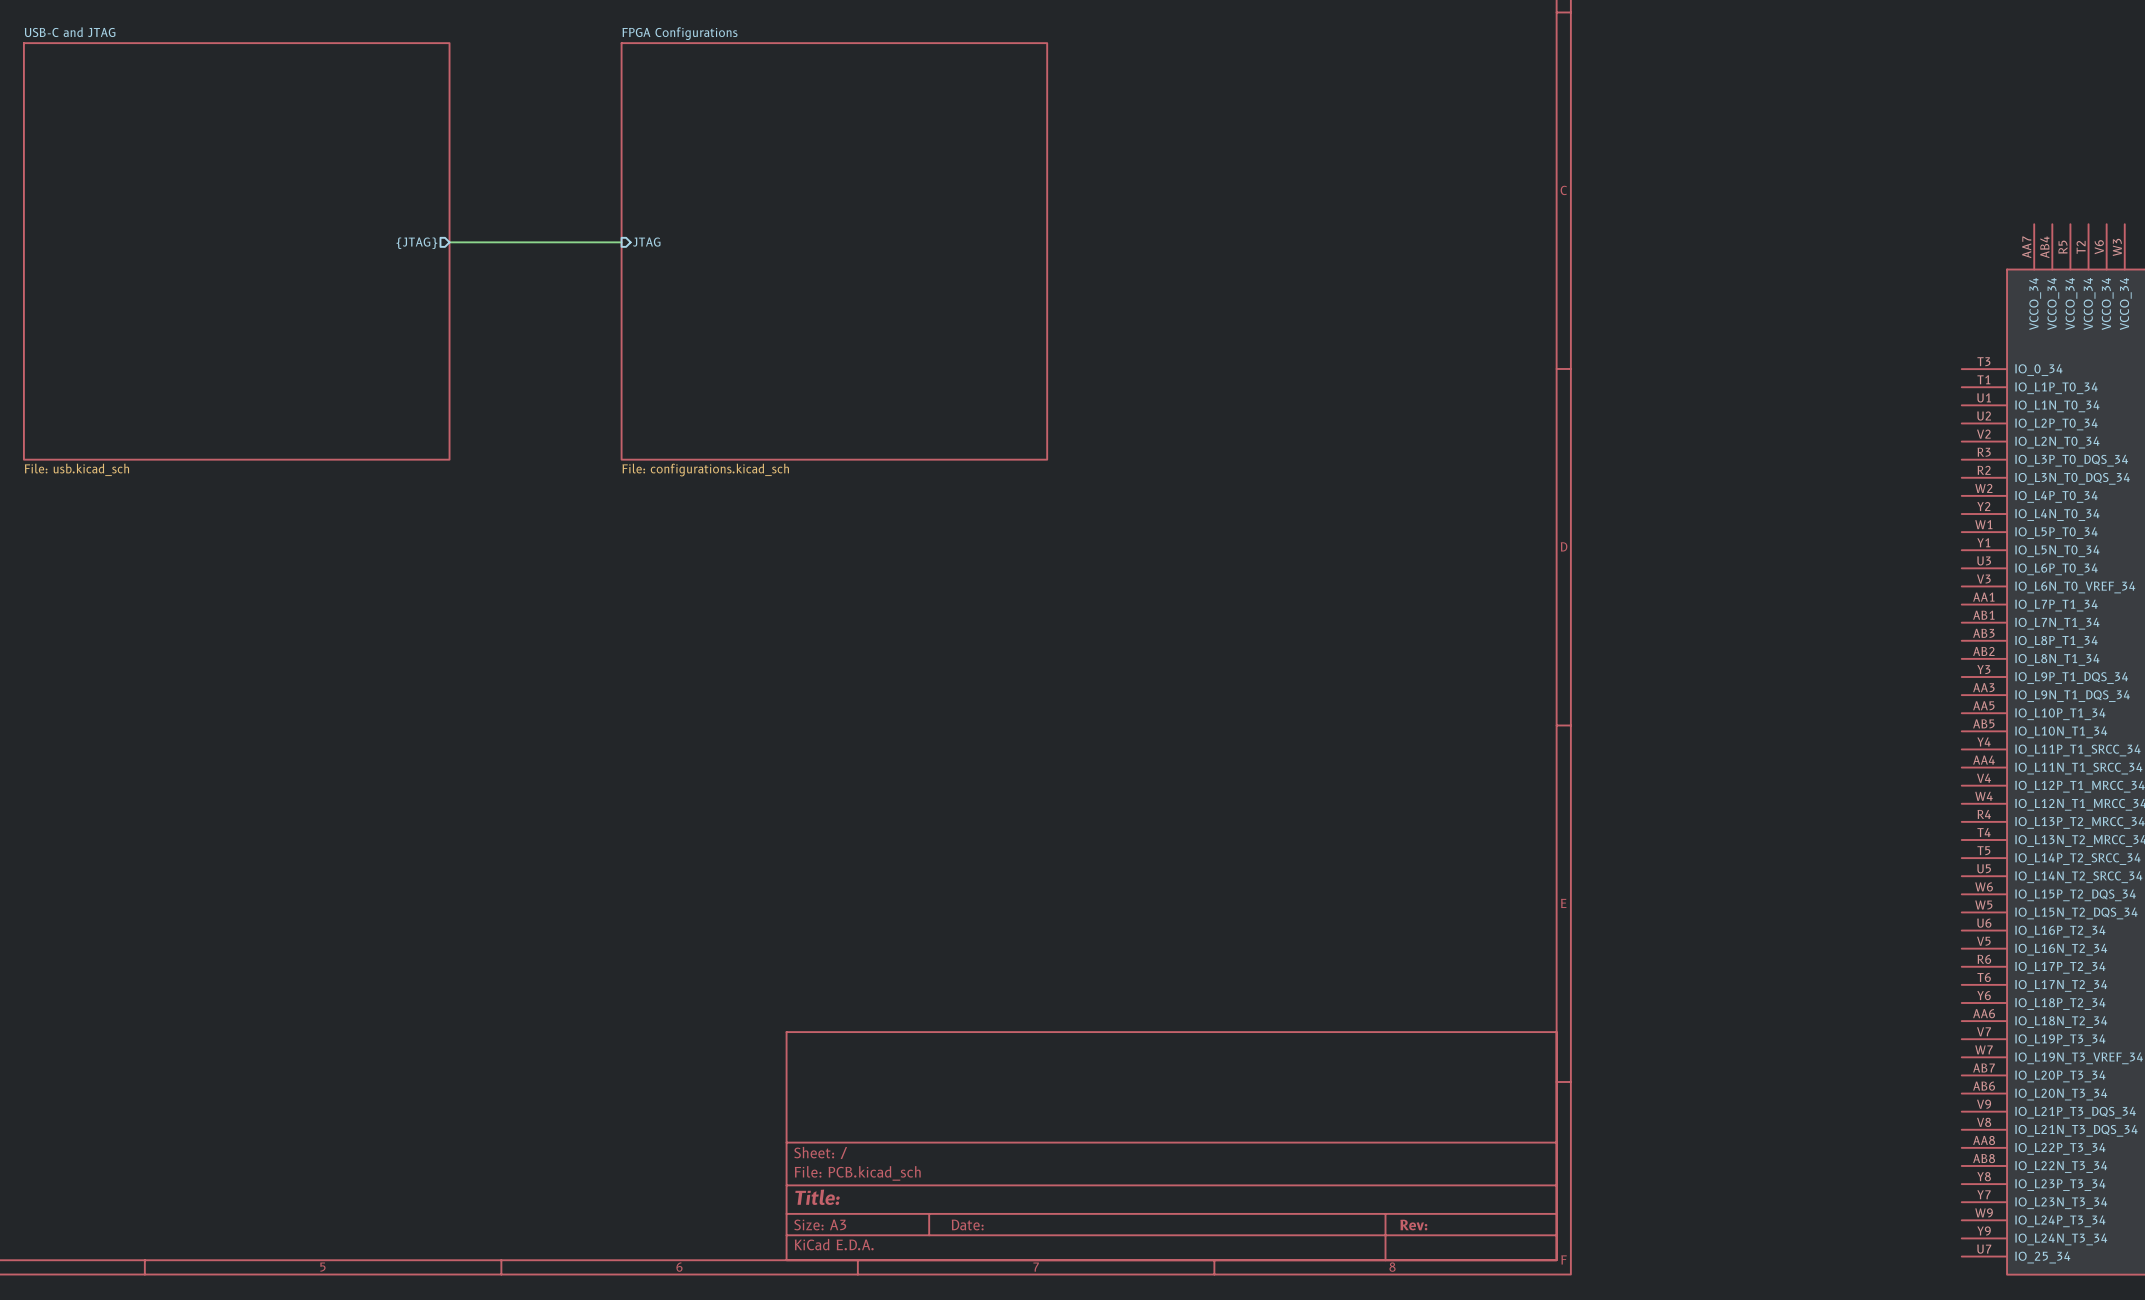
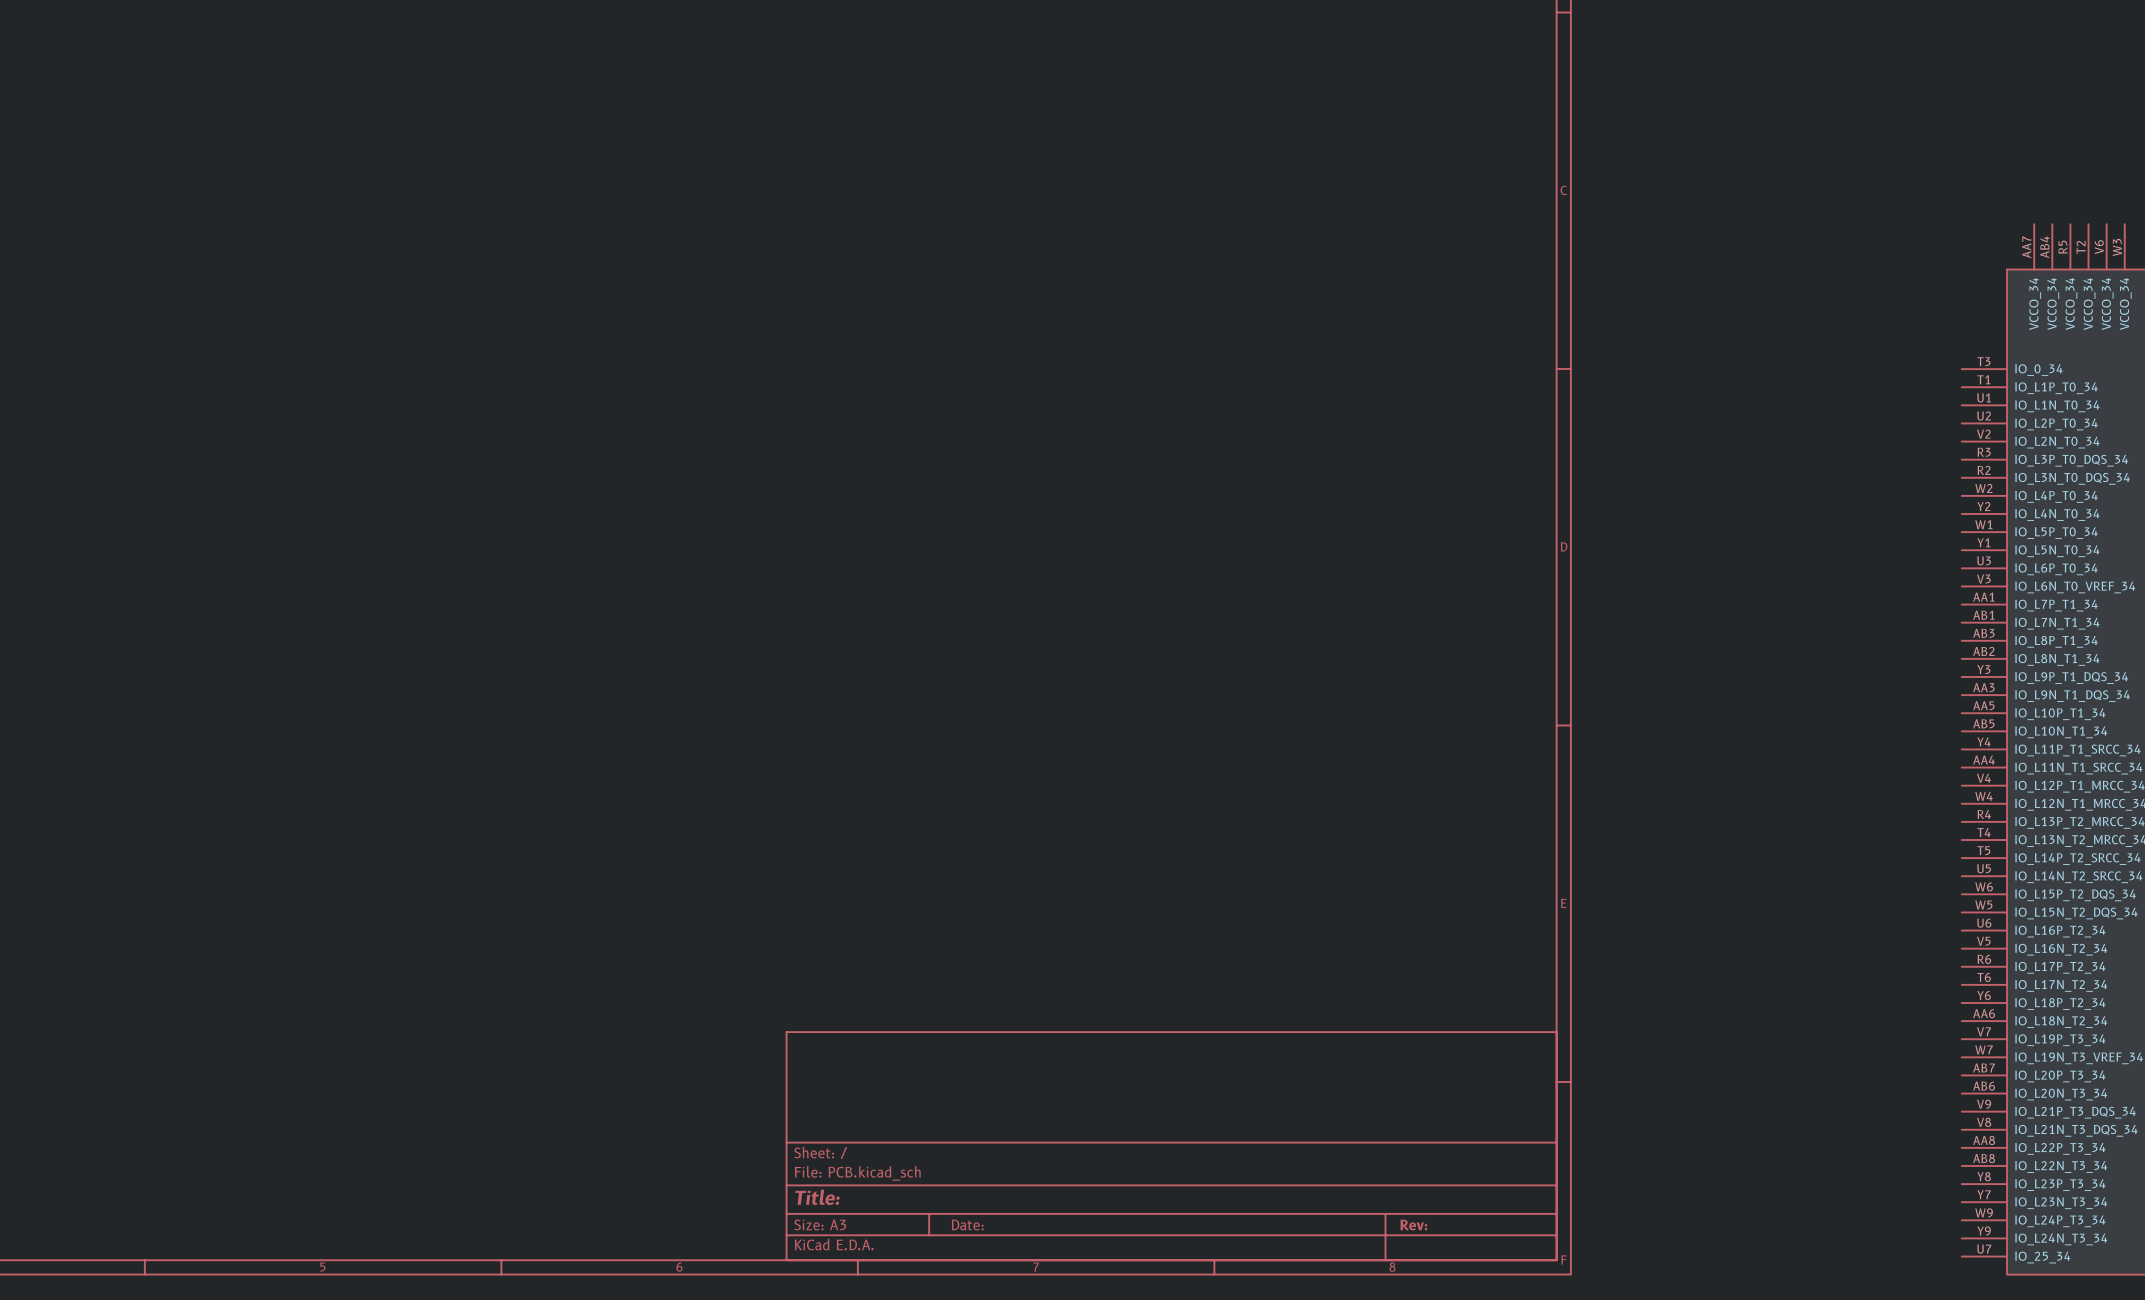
wire: (449, 242) (621, 242) -> none
sheet pin: JTAG (646, 242) -> none
sheet pin: {JTAG} (416, 243) -> none
sheet USB-C and JTAG: File: usb.kicad_sch (236, 251) -> none
sheet FPGA Configurations: File: configurations.kicad_sch (834, 251) -> none

